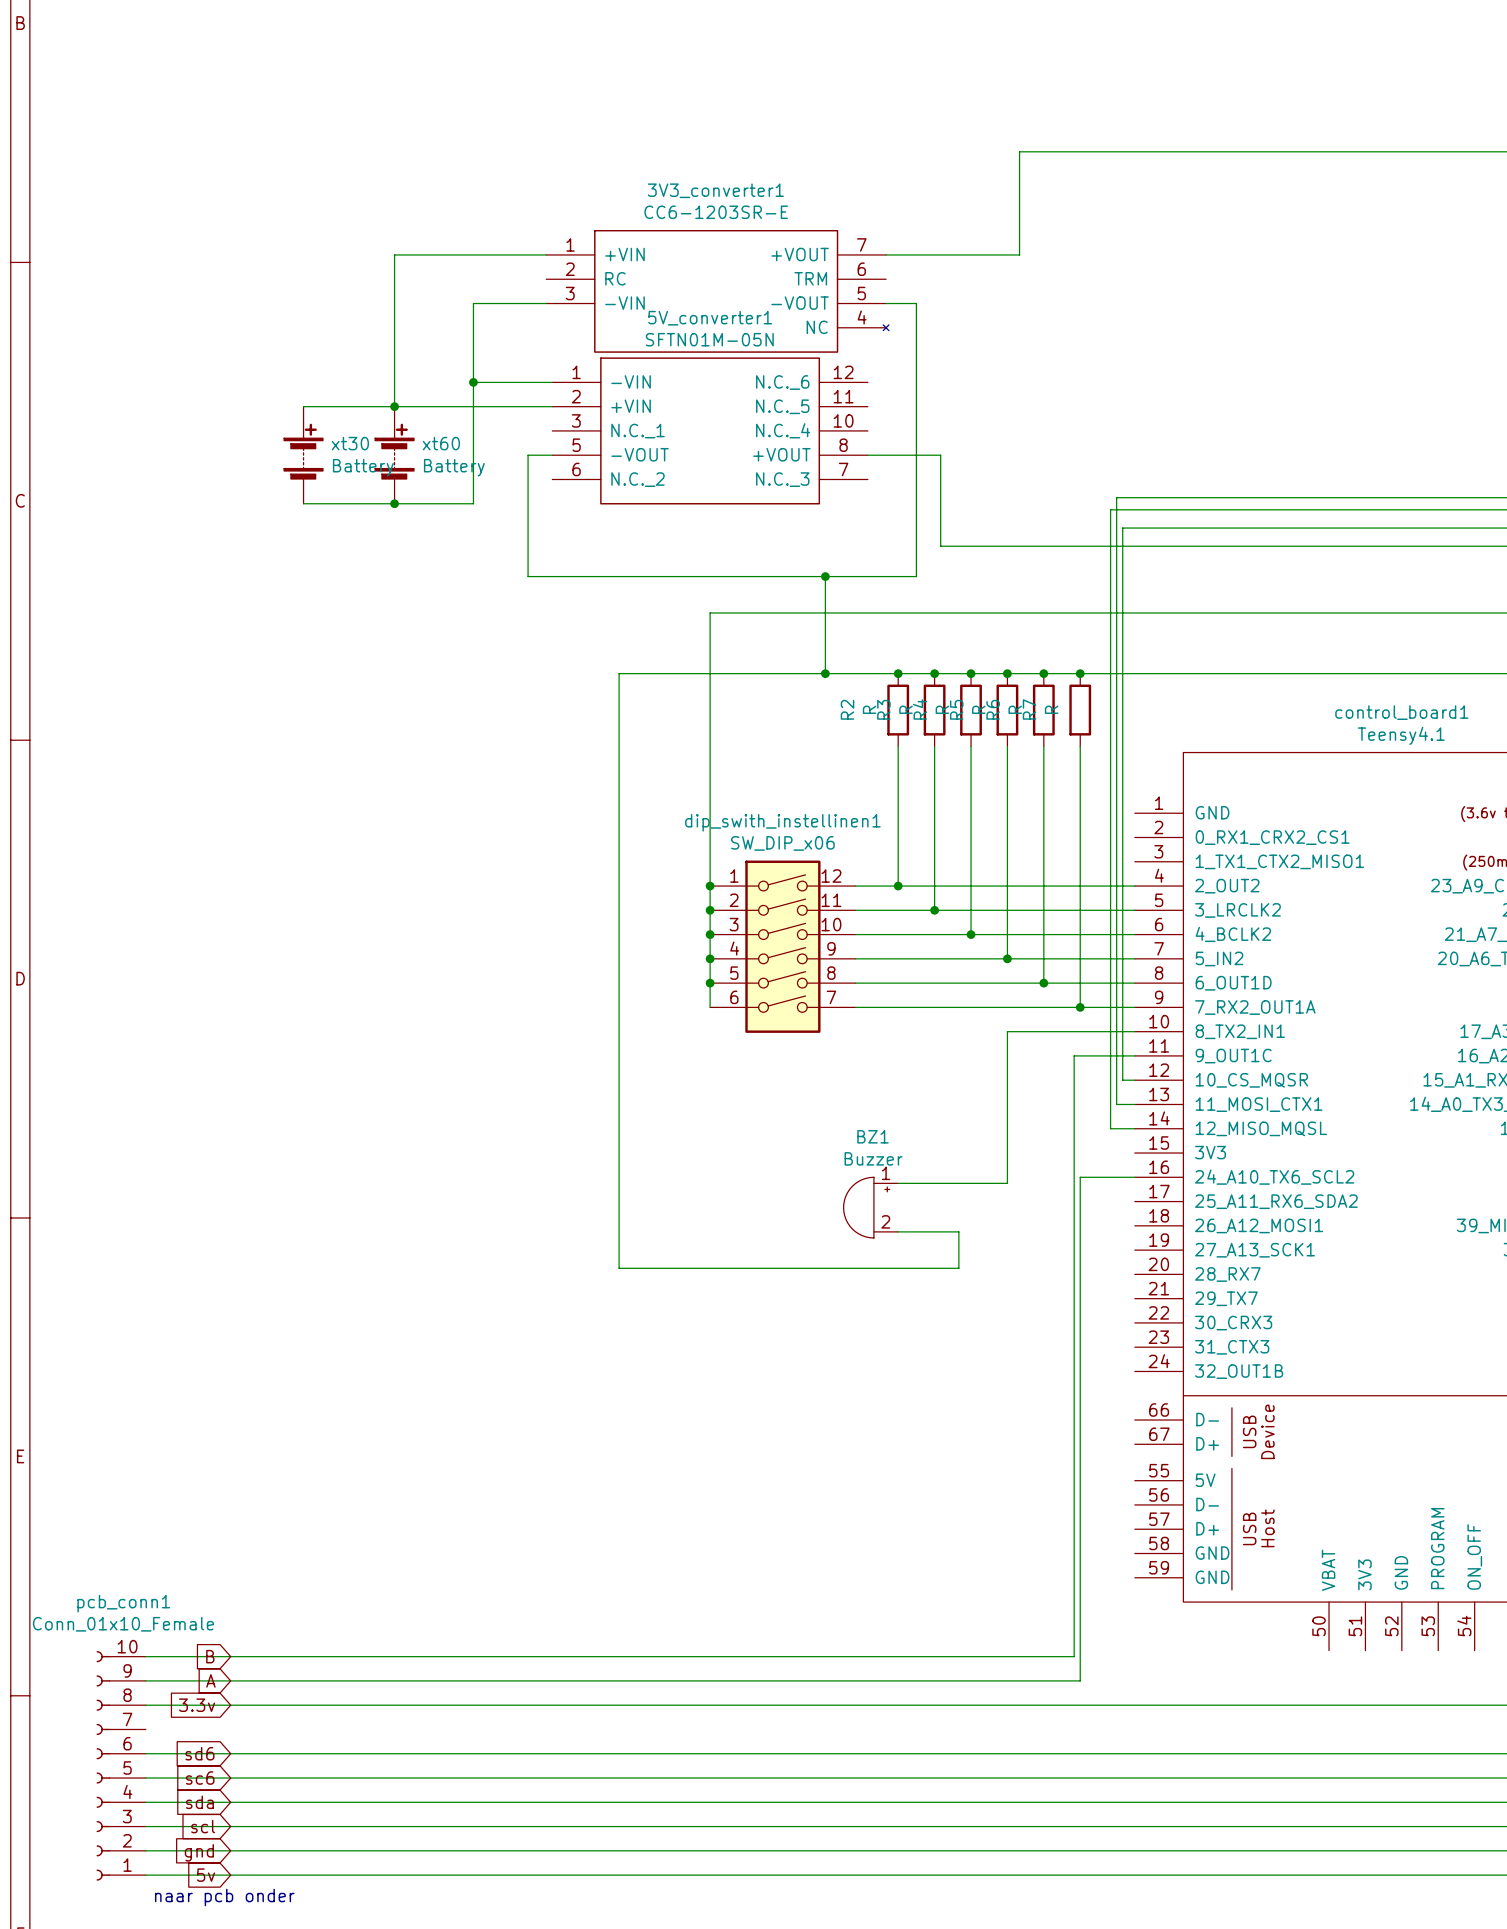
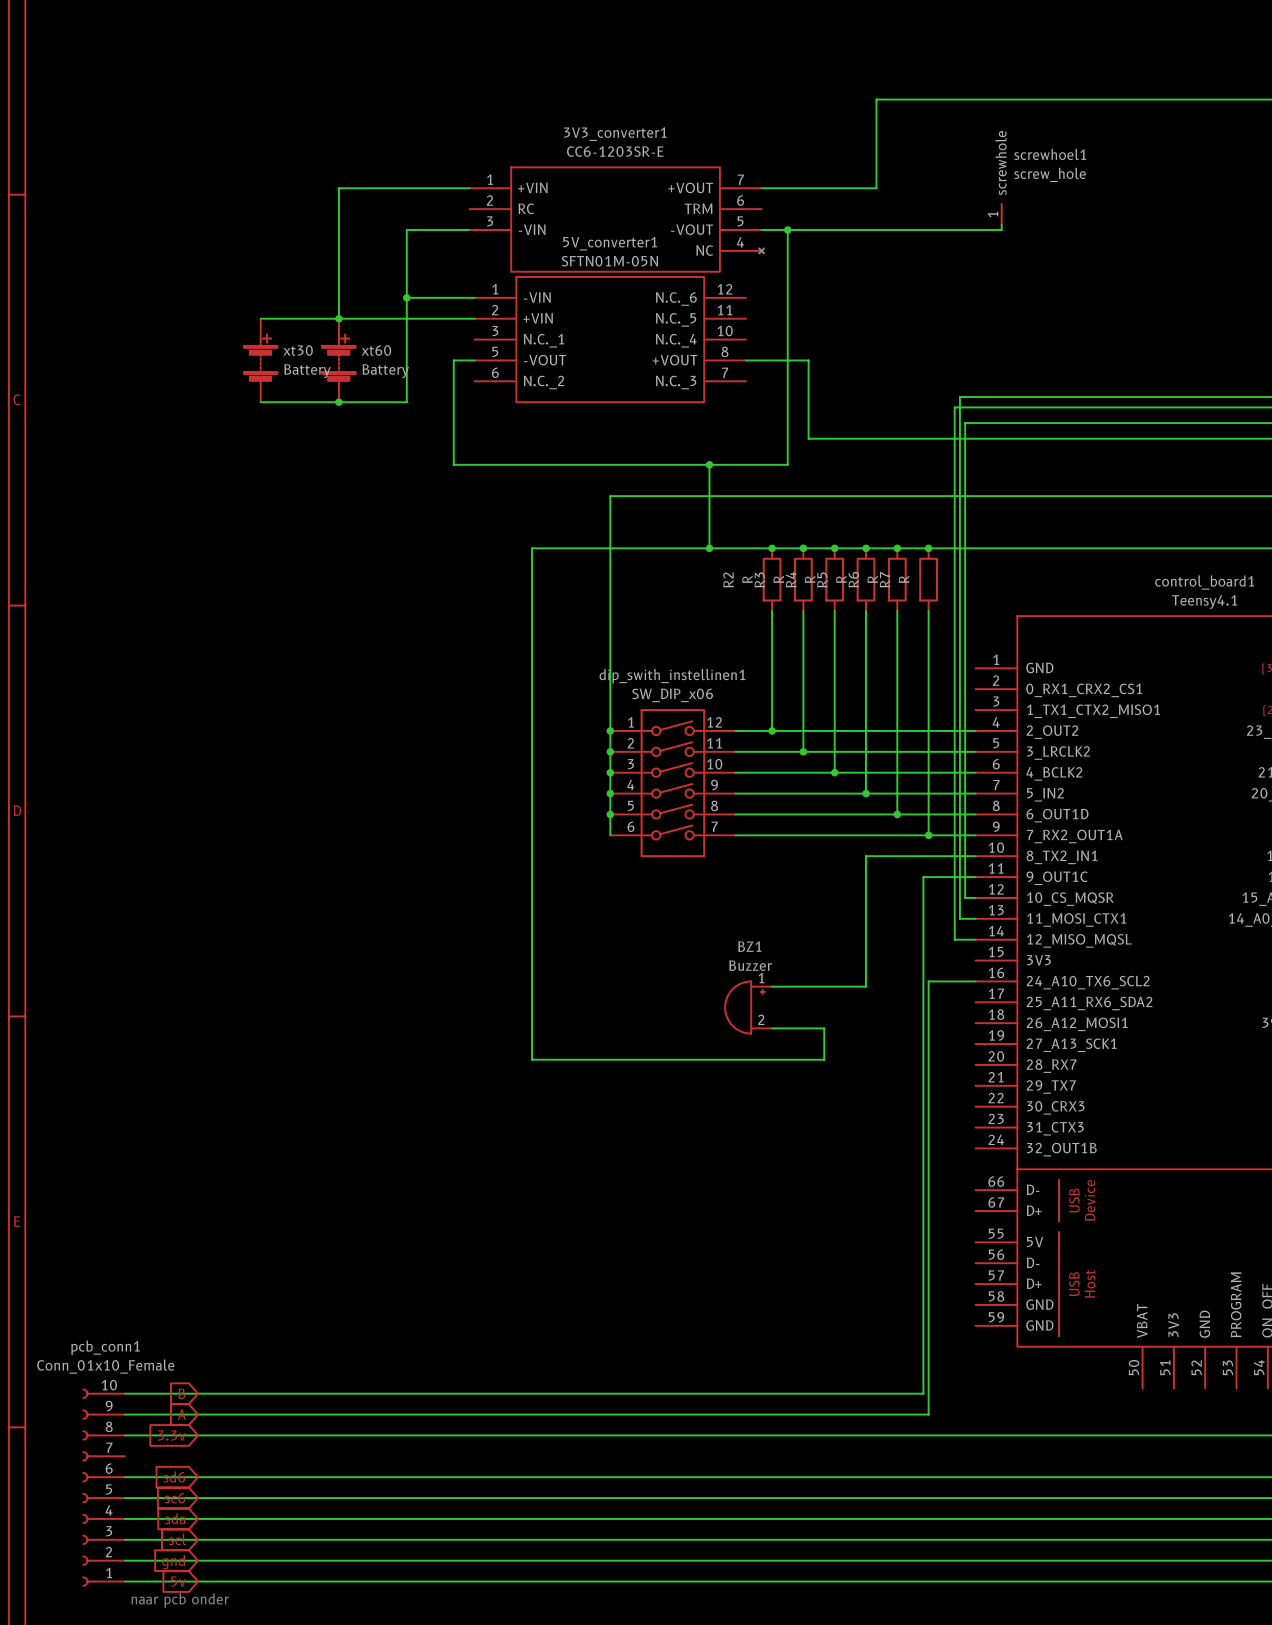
screwhoel1: none -> screw_hole (1001, 214)
wire: none -> (1001, 224) (1001, 230) (787, 230)
junction: none -> (787, 230)

